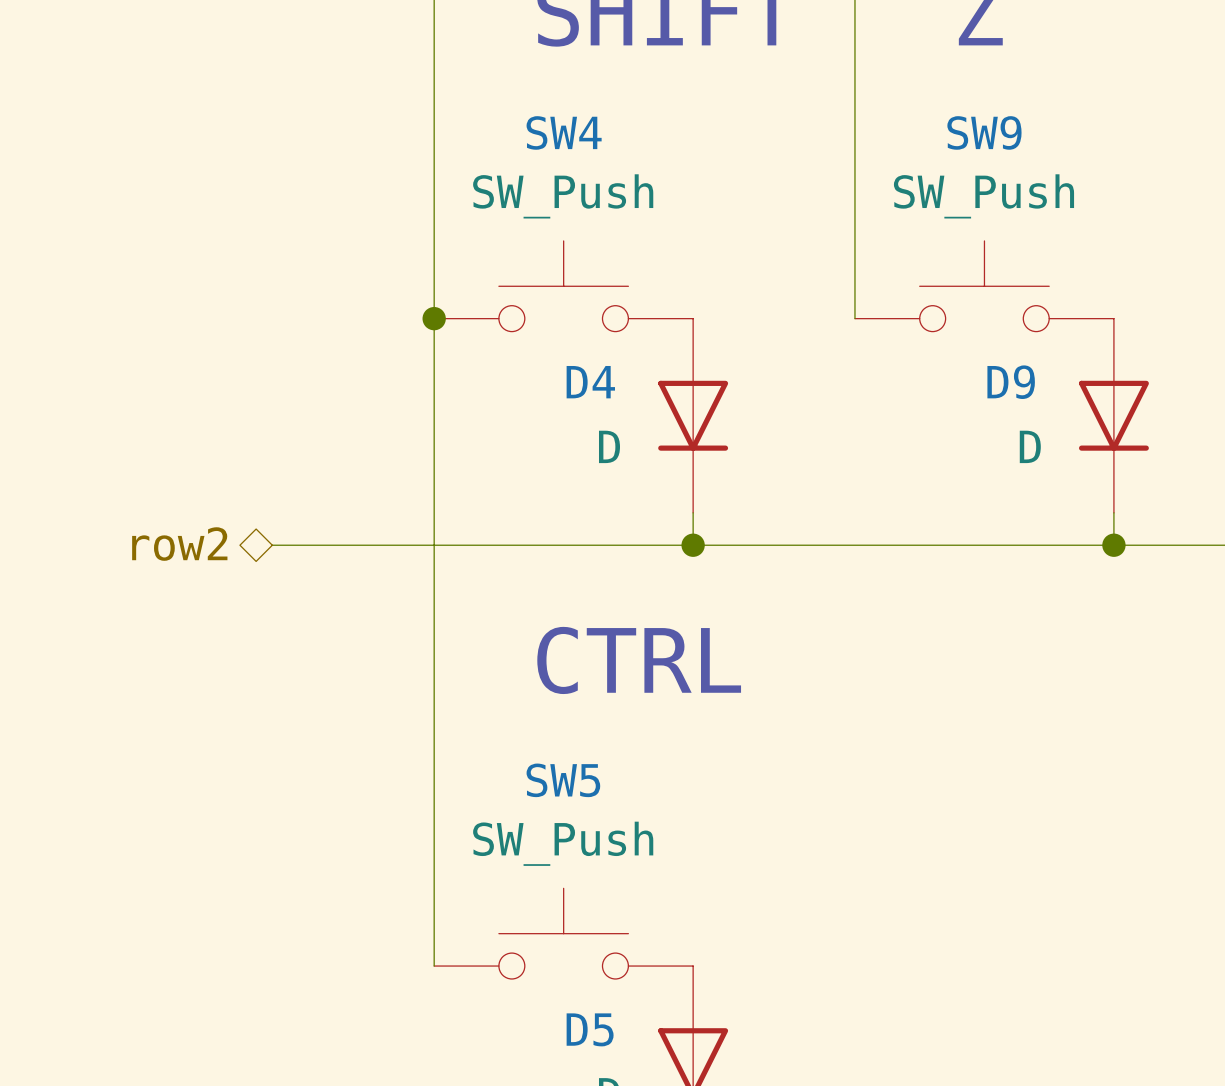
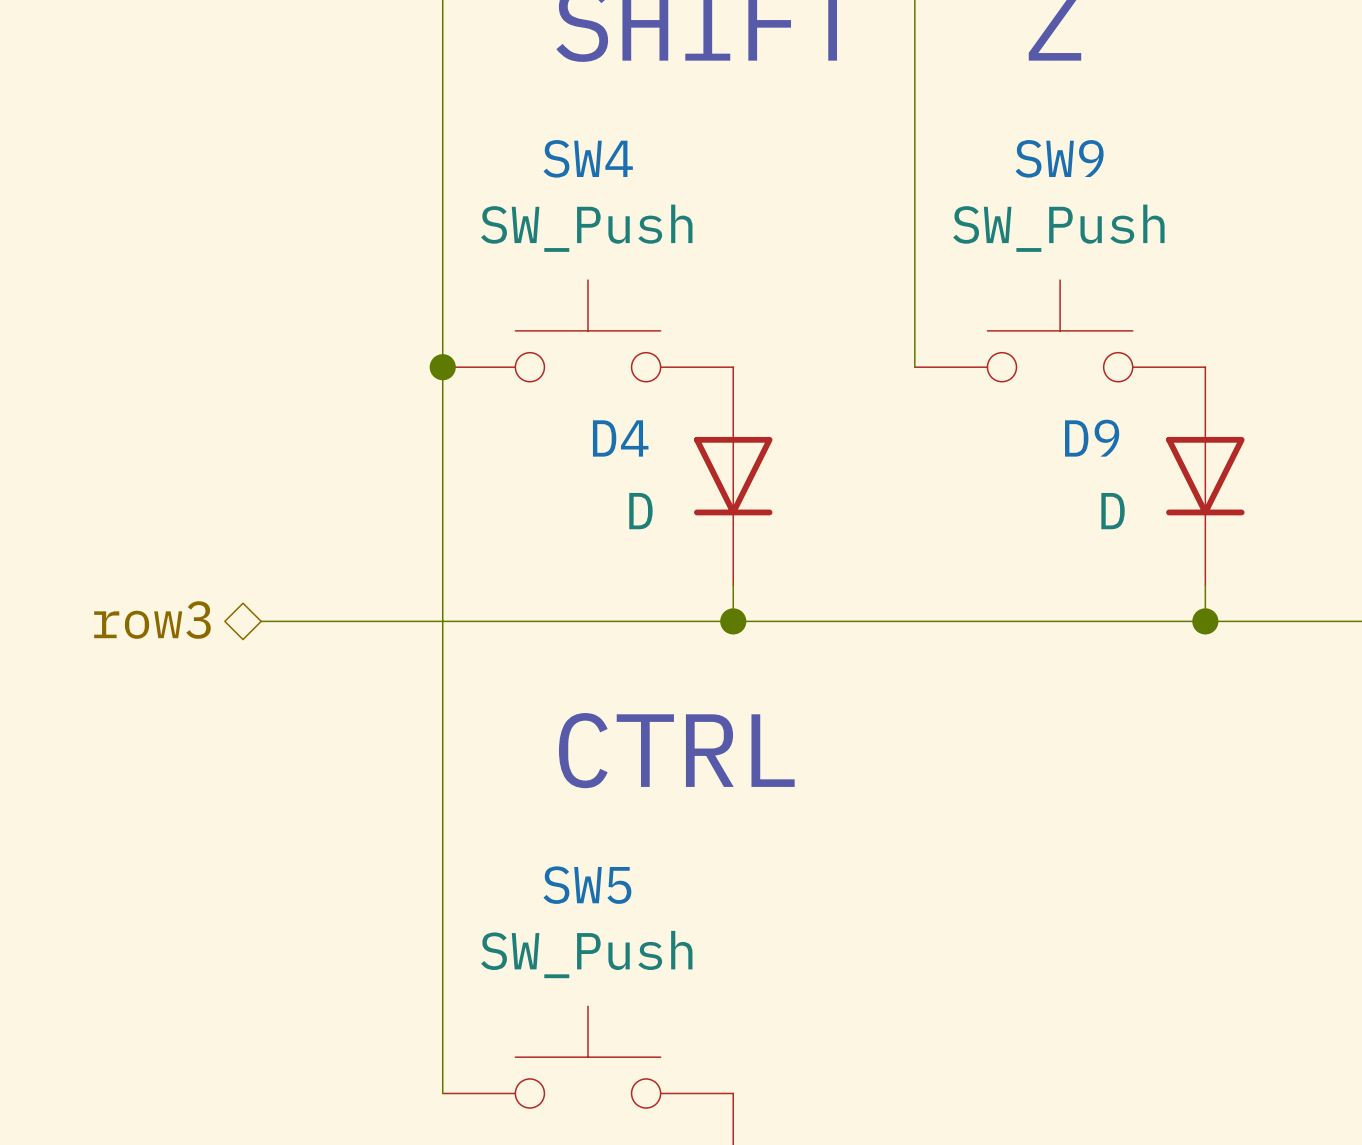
hierarchical label: row2 (179, 544) -> row3 (152, 620)

